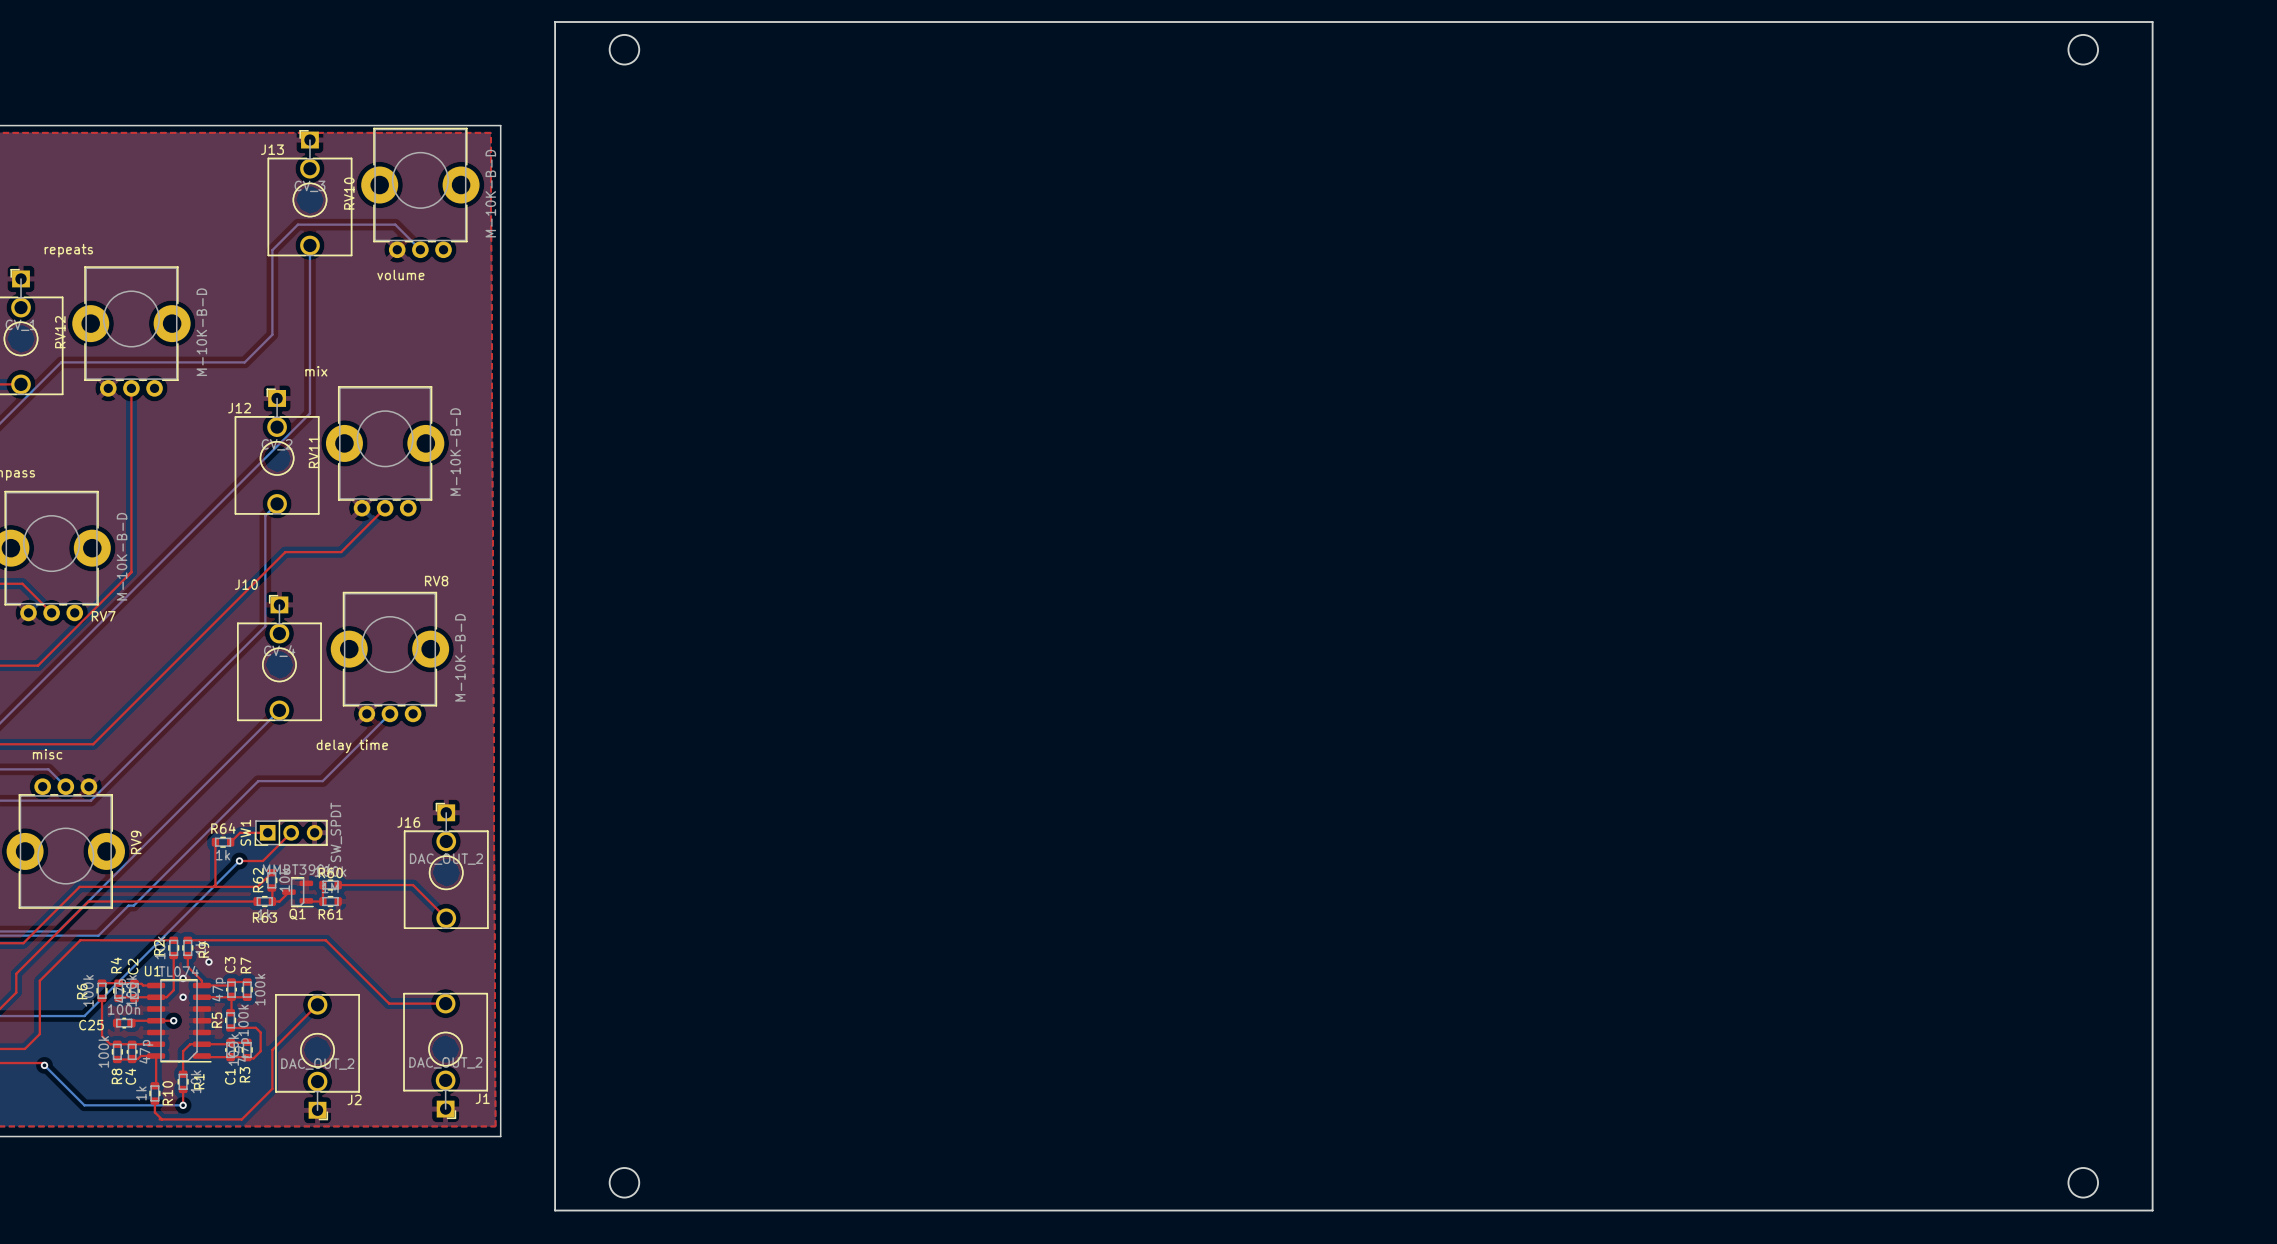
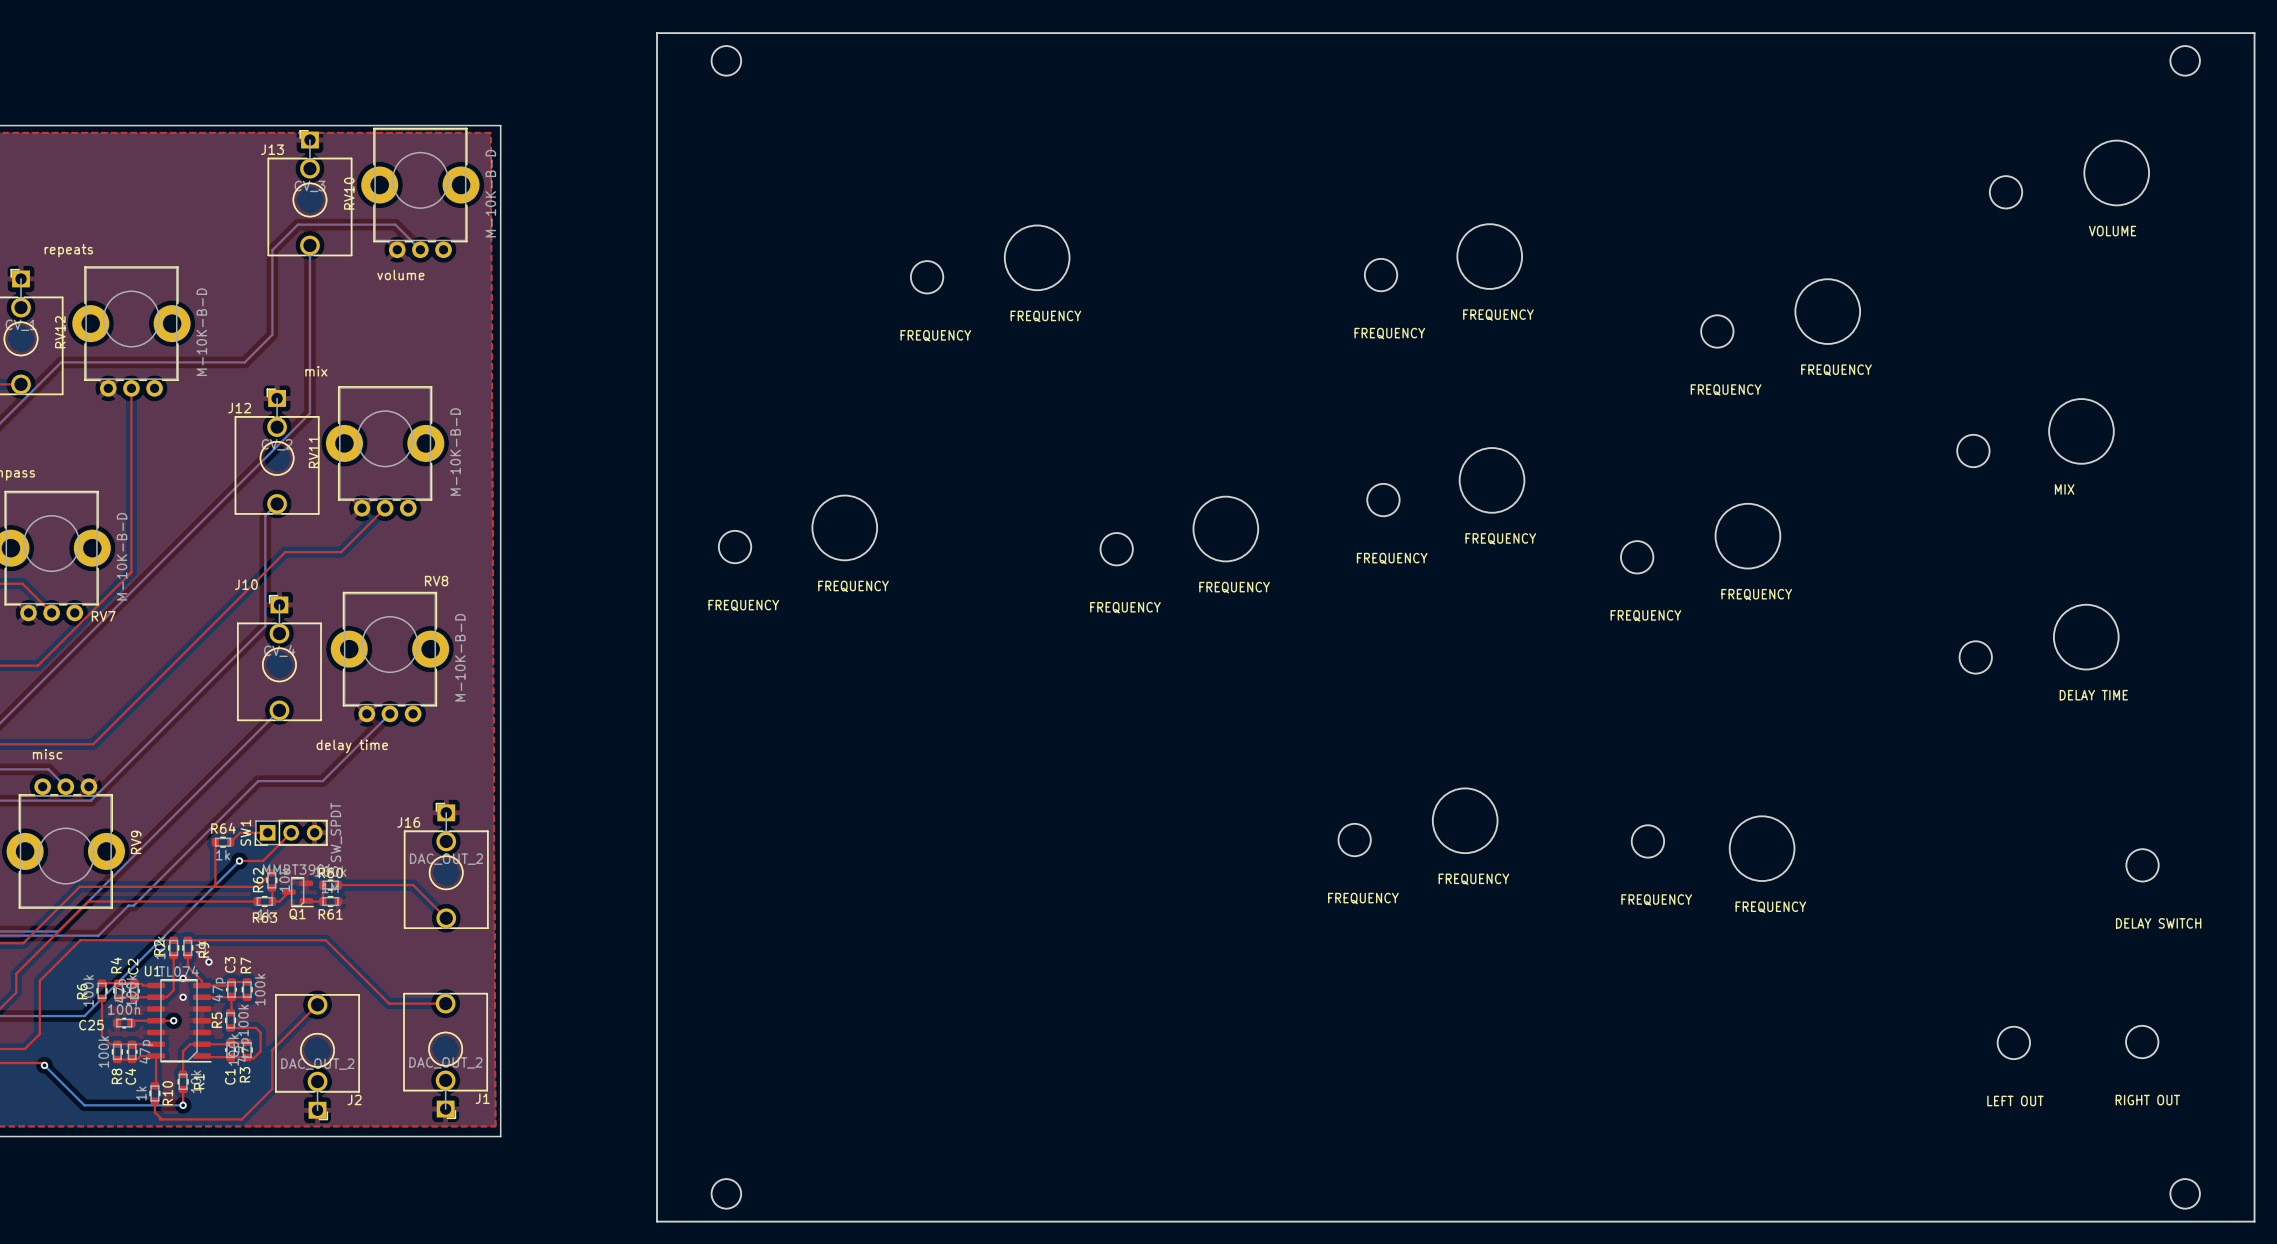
board edge: (555, 22) (2152, 22) (2152, 1210) (555, 1210) (555, 22) -> (657, 33) (2254, 33) (2254, 1221) (657, 1221) (657, 33)
round board edge position: (624, 49) -> (726, 60)
round board edge position: (2083, 49) -> (2185, 60)
round board edge: none -> [2083, 139, 2151, 207]
round board edge: none -> [1988, 175, 2024, 210]
round board edge: none -> [1456, 223, 1524, 290]
round board edge: none -> [1003, 224, 1071, 292]
text: none -> VOLUME (2112, 231)
round board edge: none -> [1363, 257, 1399, 293]
round board edge: none -> [909, 260, 945, 295]
round board edge: none -> [1794, 278, 1862, 345]
round board edge: none -> [1700, 314, 1735, 349]
text: none -> FREQUENCY (1498, 315)
text: none -> FREQUENCY (1045, 316)
text: none -> FREQUENCY (1389, 333)
text: none -> FREQUENCY (935, 335)
text: none -> FREQUENCY (1836, 370)
text: none -> FREQUENCY (1726, 389)
round board edge: none -> [2048, 398, 2115, 465]
round board edge: none -> [1956, 433, 1991, 469]
round board edge: none -> [1458, 447, 1526, 514]
round board edge: none -> [1366, 482, 1401, 518]
text: none -> MIX (2064, 489)
round board edge: none -> [811, 494, 879, 562]
round board edge: none -> [1192, 495, 1260, 563]
round board edge: none -> [1714, 502, 1782, 570]
round board edge: none -> [717, 529, 753, 565]
round board edge: none -> [1099, 532, 1134, 567]
text: none -> FREQUENCY (1500, 538)
round board edge: none -> [1620, 540, 1655, 575]
text: none -> FREQUENCY (1392, 558)
text: none -> FREQUENCY (853, 586)
text: none -> FREQUENCY (1234, 587)
text: none -> FREQUENCY (1756, 594)
round board edge: none -> [2052, 603, 2120, 671]
text: none -> FREQUENCY (743, 605)
text: none -> FREQUENCY (1125, 607)
text: none -> FREQUENCY (1645, 615)
round board edge: none -> [1958, 640, 1993, 675]
text: none -> DELAY TIME (2093, 695)
round board edge: none -> [1431, 787, 1499, 855]
round board edge: none -> [1728, 815, 1796, 882]
round board edge: none -> [1337, 822, 1372, 858]
round board edge: none -> [1630, 824, 1666, 859]
round board edge: none -> [2125, 848, 2160, 883]
text: none -> FREQUENCY (1473, 879)
text: none -> FREQUENCY (1363, 898)
text: none -> FREQUENCY (1656, 899)
text: none -> FREQUENCY (1770, 907)
text: none -> DELAY SWITCH (2158, 923)
round board edge: none -> [2125, 1024, 2160, 1060]
round board edge: none -> [1996, 1025, 2031, 1061]
text: none -> LEFT OUT (2015, 1100)
text: none -> RIGHT OUT (2147, 1100)
round board edge position: (624, 1182) -> (726, 1193)
round board edge position: (2083, 1182) -> (2185, 1193)

